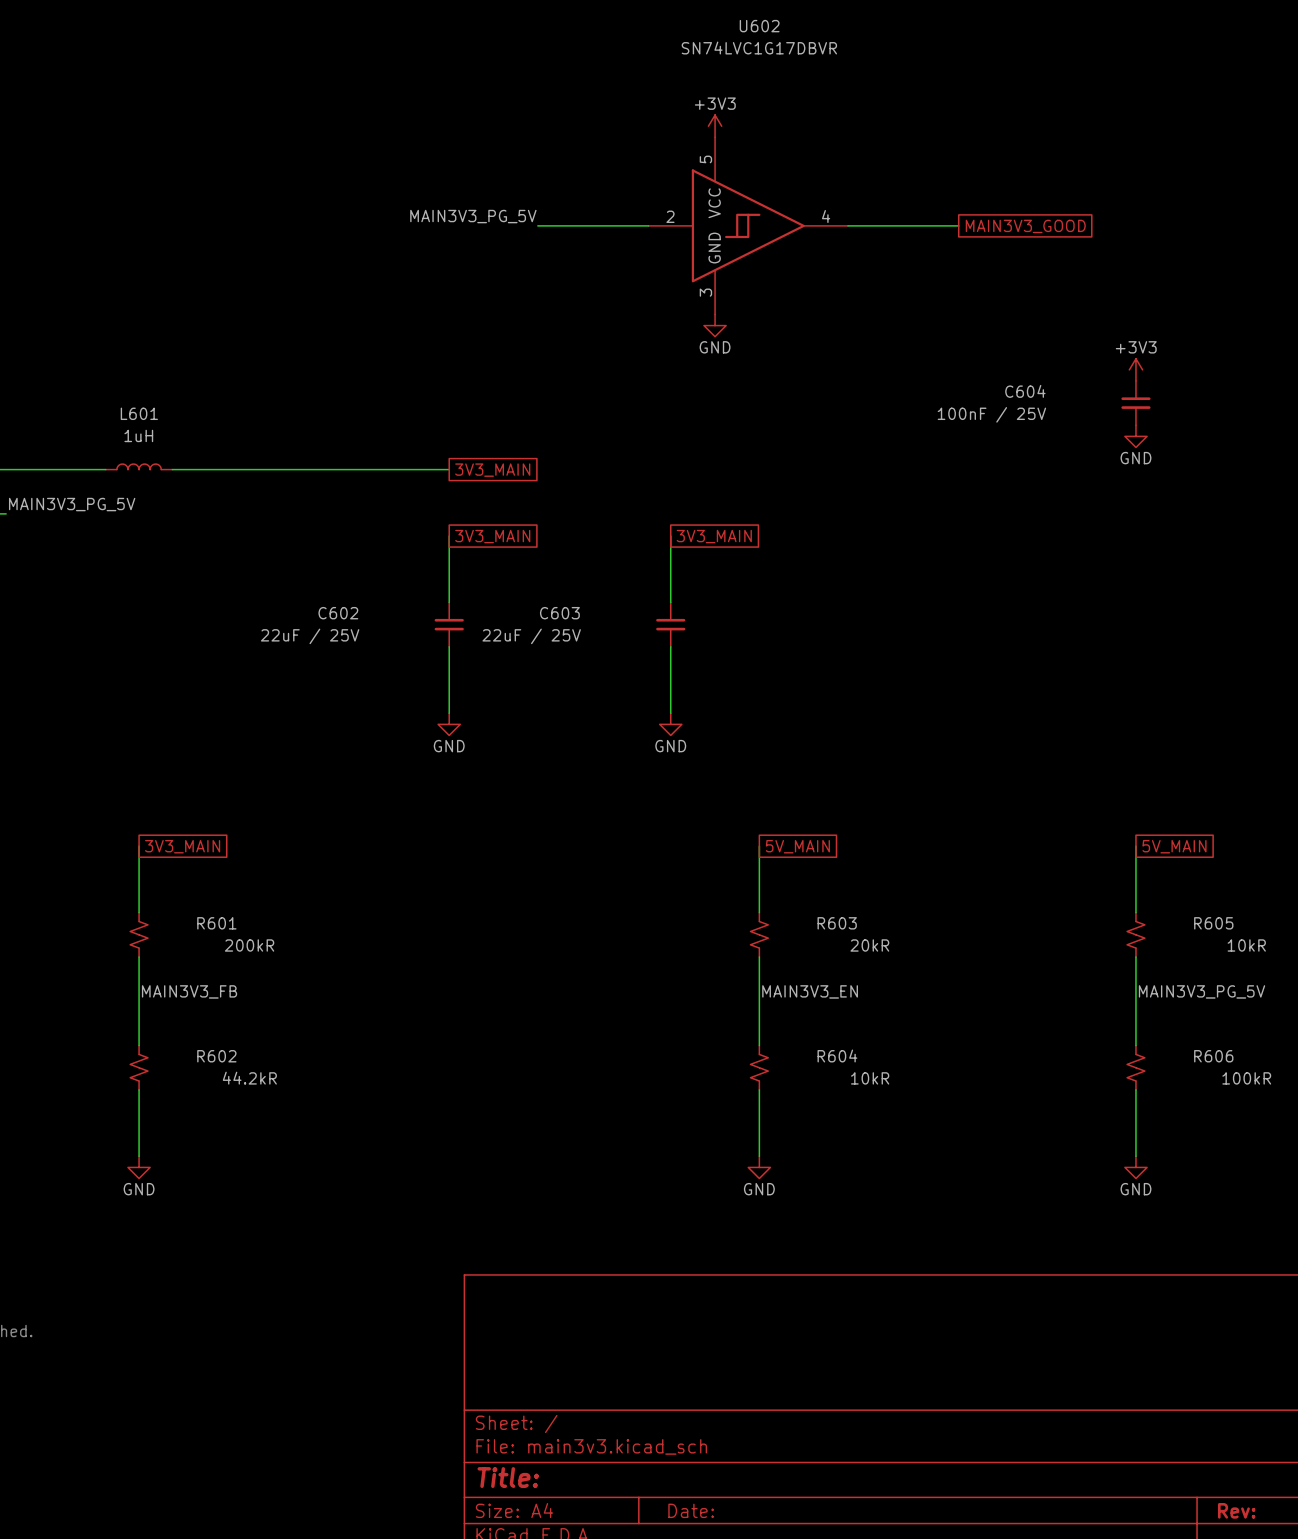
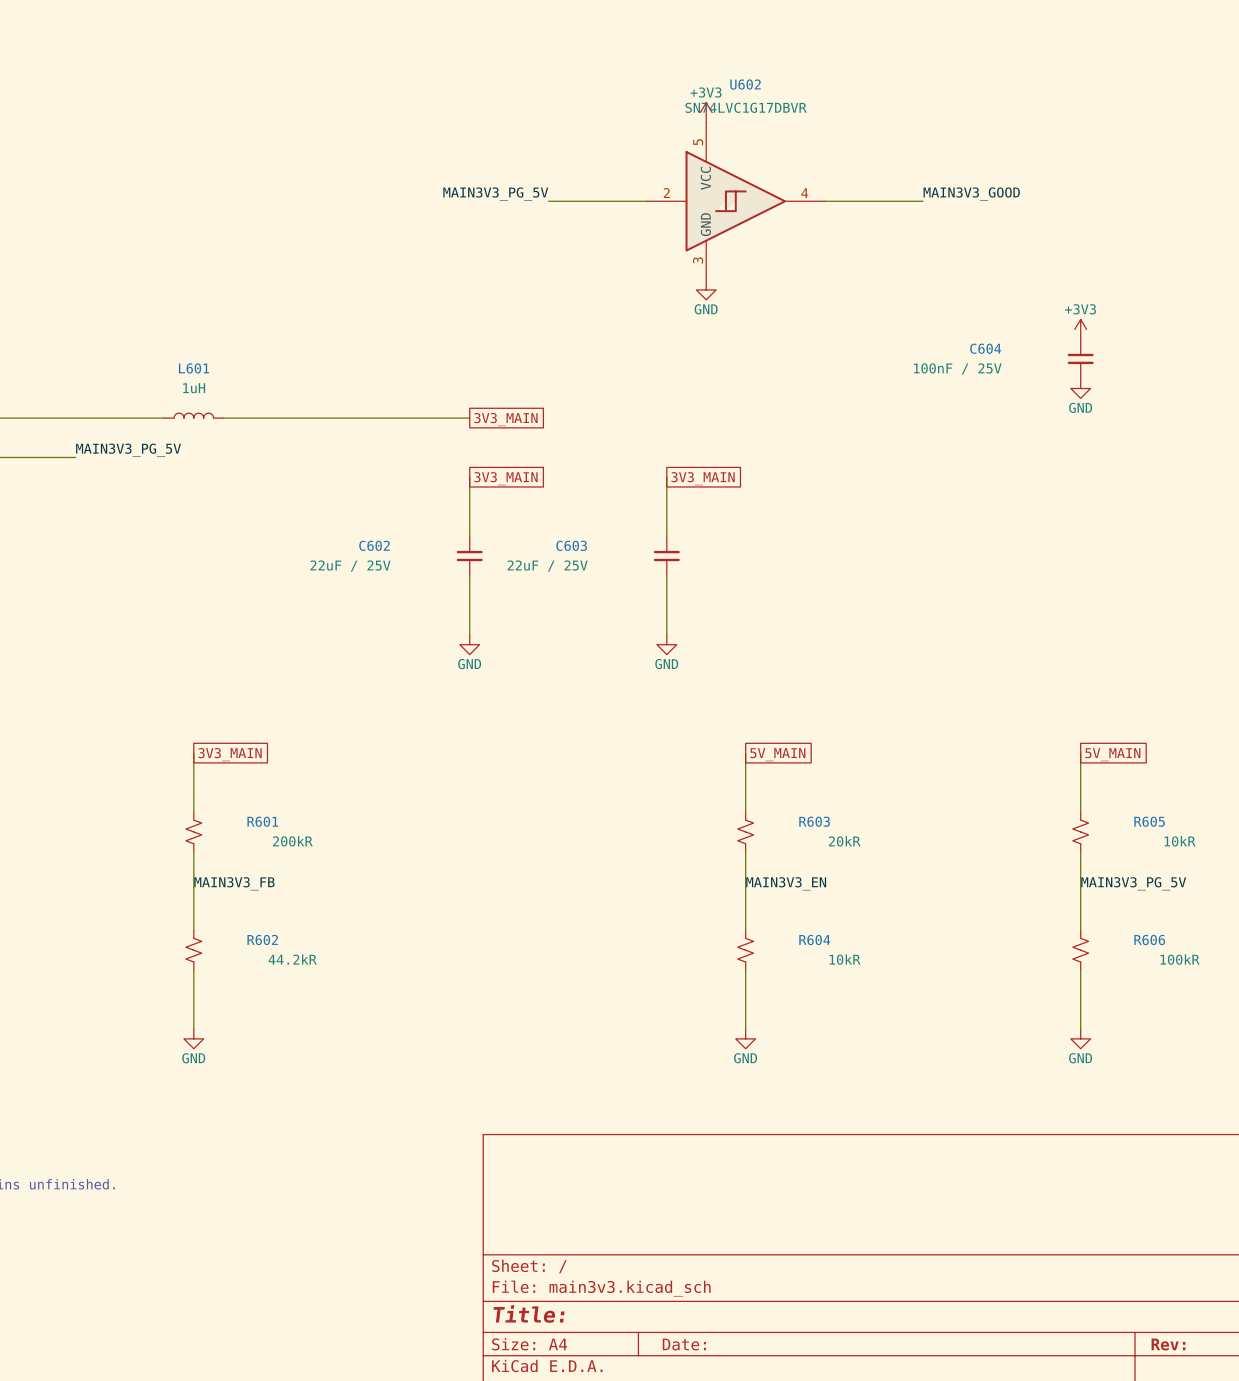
U602 name position: U602 (759, 26) -> U602 (745, 84)
U602 value position: SN74LVC1G17DBVR (759, 48) -> SN74LVC1G17DBVR (746, 107)
label: none -> MAIN3V3_GOOD (971, 193)
global label: MAIN3V3_GOOD (1025, 226) -> none

